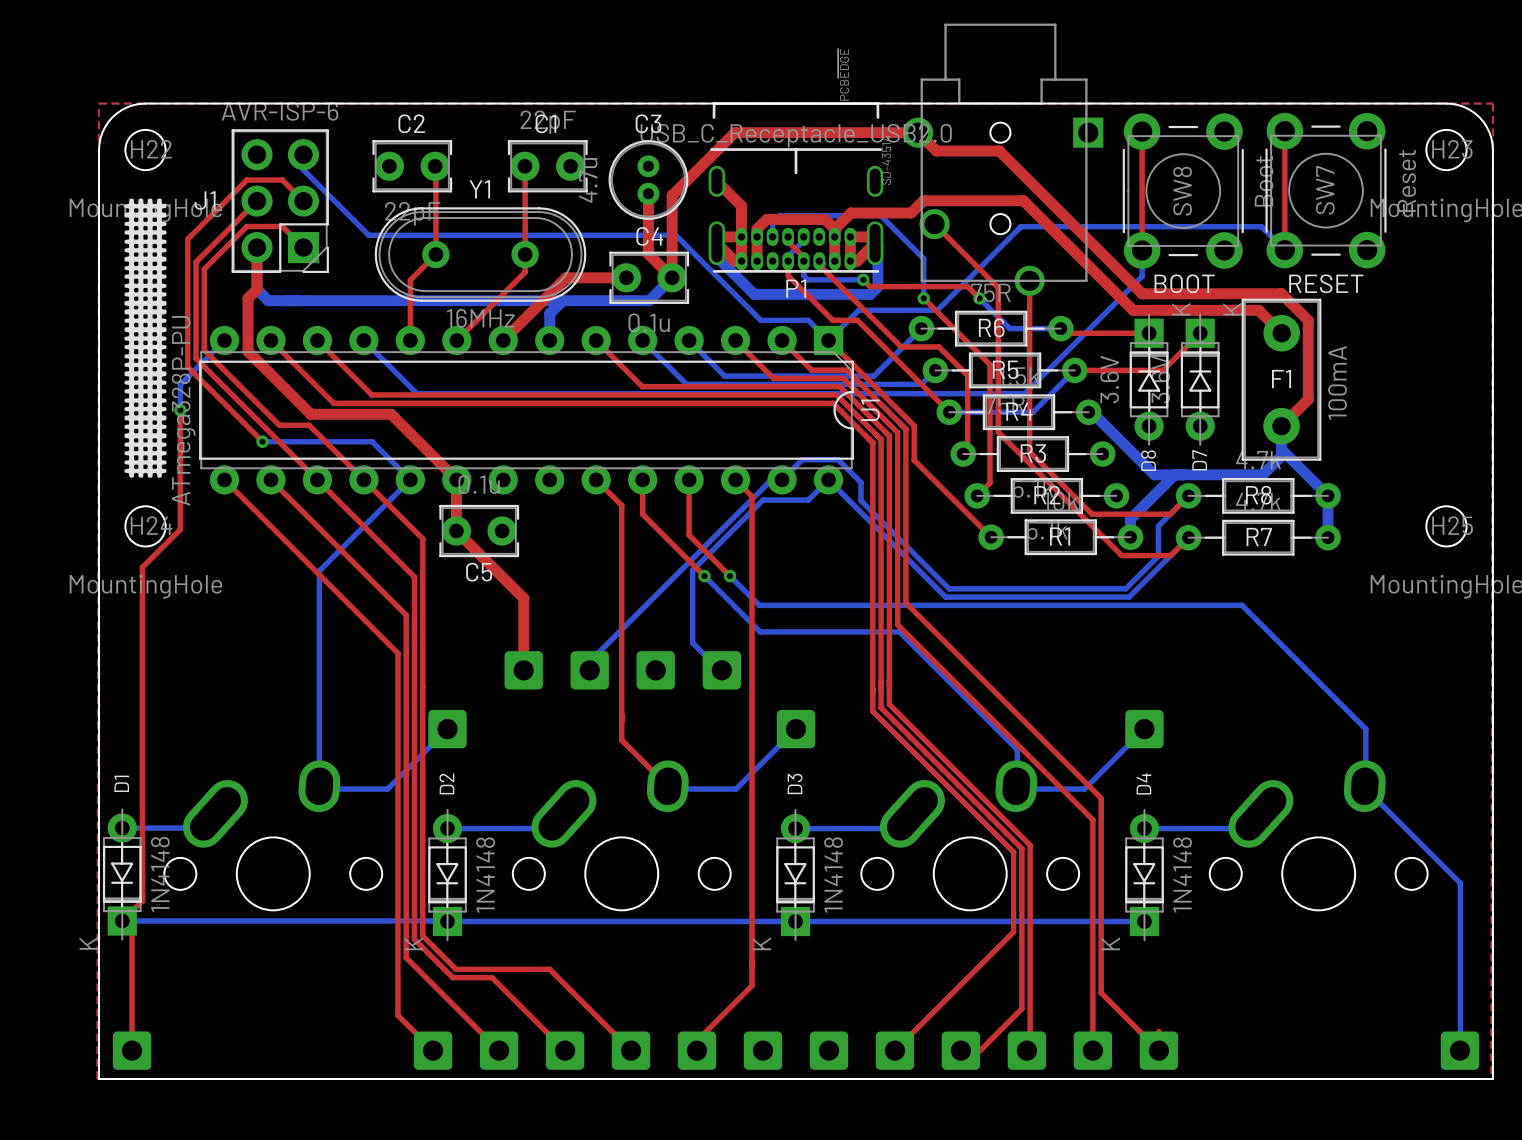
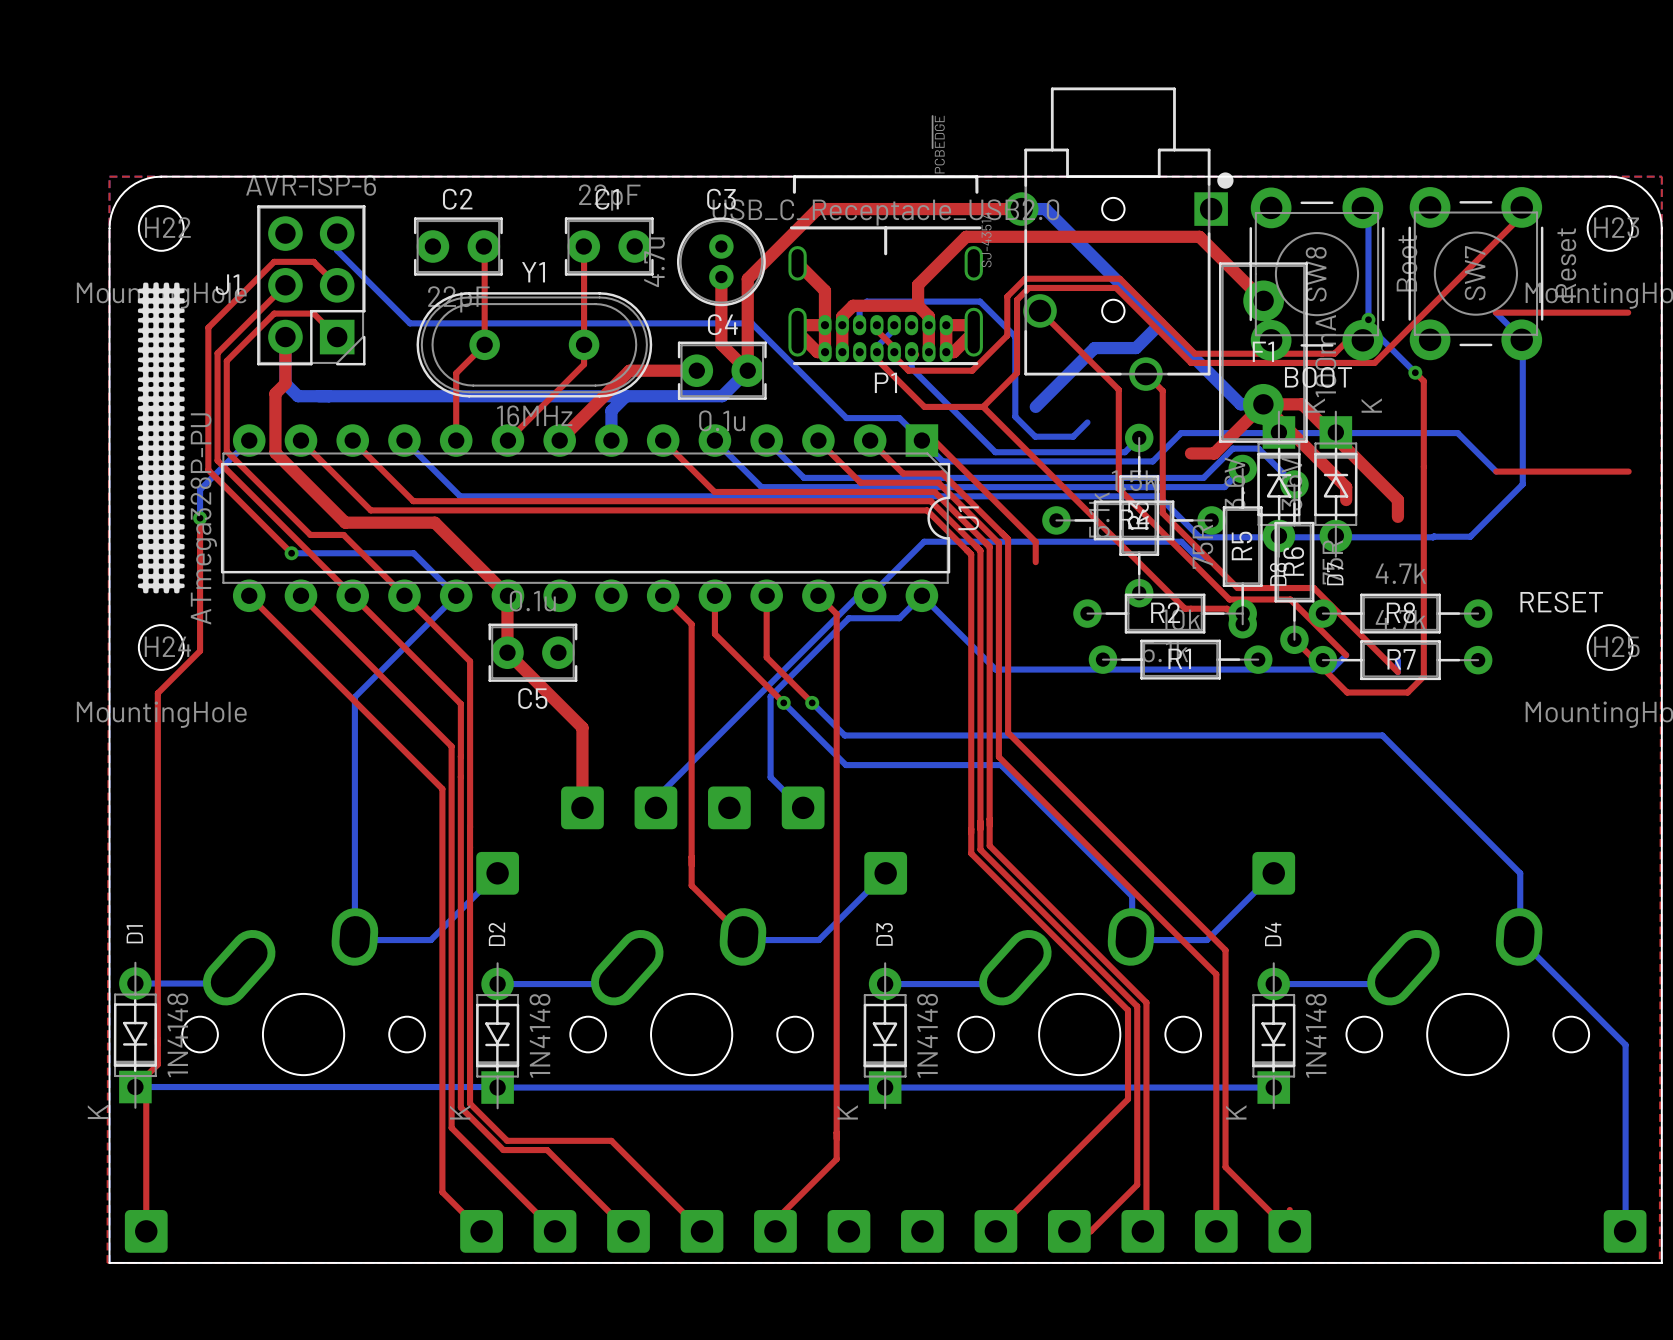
part footprint: [903, 23, 1104, 296] -> [1004, 87, 1234, 391]
top track: (1142, 131) (1142, 250) -> none
top track: (1284, 131) (1284, 250) -> none
top track: (918, 132) (936, 150) (999, 150) (1142, 293) (1281, 293) (1308, 320) (1308, 399) (1281, 426) -> none
bottom track: none -> (1021, 209) (1045, 209) (1240, 404) (1263, 404)
top track: none -> (1525, 211) (1374, 362) (1191, 362) (1116, 287) (1028, 287) (1017, 299) (1017, 373) (983, 406)
bottom track: none -> (1368, 214) (1368, 325) (1415, 372)
top track: none -> (1263, 300) (1199, 236) (966, 236) (918, 284) (918, 305)
top track: none -> (1495, 312) (1628, 312)
bottom track: none -> (1495, 312) (1522, 339) (1522, 484) (1470, 536) (1433, 536)
top track: (834, 229) (851, 212) (911, 212) (923, 200) (1023, 200) (1133, 310) (1258, 310) (1281, 333) -> none
top track: none -> (1368, 319) (1334, 353) (1194, 353) (1119, 278) (1025, 278) (1007, 296) (1007, 335) (972, 370) (908, 370) (894, 356)
via: none -> (1368, 319)
bottom track: none -> (1160, 323) (1135, 348) (1094, 348) (1035, 406)
bottom track: (716, 243) (716, 256) (754, 294) (870, 294) (877, 286) (877, 246) (875, 243) -> none
bottom track: (912, 247) (923, 258) (923, 298) -> (1015, 336) (1015, 416) (1035, 436) (1073, 436) (1087, 422)
bottom track: (1142, 250) (1142, 276) (1024, 393) (417, 393) (413, 390) -> (1434, 536) (1199, 537) (1158, 496) (460, 496)
bottom track: (1284, 250) (1261, 226) (1021, 226) (937, 310) (858, 310) (828, 340) -> none
bottom track: (803, 261) (803, 275) (807, 279) (863, 279) -> none
top track: (819, 261) (819, 265) (901, 346) (939, 346) (967, 375) (967, 449) (963, 454) -> none
bottom track: none -> (911, 357) (911, 368) (995, 452) (1124, 452) (1139, 437)
top track: (788, 267) (788, 275) (832, 320) (857, 320) (949, 412) -> (877, 359) (924, 406) (983, 406)
top track: (863, 279) (870, 286) (967, 286) (979, 298) -> none
via: (863, 279) -> none
top track: none -> (1415, 372) (1423, 381) (1423, 676) (1407, 692) (1347, 692) (1294, 639)
via: none -> (1415, 372)
top track: (1029, 280) (1029, 451) (1092, 514) (1170, 514) (1188, 495) -> (1145, 374) (1162, 390) (1162, 513) (1237, 588) (1313, 588) (1397, 672)
text position: RESET (1326, 283) -> RESET (1561, 602)
top track: (998, 287) (998, 432) (1121, 555) (1170, 555) (1188, 537) -> (1110, 381) (1118, 389) (1118, 488) (1229, 599) (1290, 599) (1346, 655)
top track: (923, 298) (989, 364) (989, 483) (977, 495) -> none
via: (923, 298) -> none
bottom track: (979, 298) (1009, 328) (1060, 328) -> none
via: (979, 298) -> none
top track: none -> (1263, 404) (1346, 487) (1346, 500)
top track: none -> (1263, 404) (1214, 453) (1190, 453)
top track: none -> (1263, 404) (1302, 404) (1397, 500) (1397, 516)
top track: none -> (983, 406) (1184, 608) (1227, 608) (1242, 624)
bottom track: (921, 328) (873, 376) (724, 376) (722, 374) -> (1294, 484) (1258, 448) (1232, 448) (1203, 477) (804, 477)
R6 rotation: 0° (991, 328) -> 90° clockwise (1294, 562)
R6 position: (991, 328) -> (1294, 562)
top track: (1060, 328) (1065, 333) (1149, 333) -> none
top track: (1200, 333) (1163, 370) (1074, 370) -> none
top track: (828, 340) (914, 425) (914, 460) (991, 537) -> none
top track: none -> (934, 440) (1035, 541) (1035, 562)
bottom track: none -> (935, 453) (942, 461) (1152, 461) (1181, 433) (1457, 433) (1496, 471)
top track: none -> (1496, 471) (1628, 471)
bottom track: (935, 370) (921, 384) (686, 384) (684, 382) -> (1242, 469) (1224, 487) (761, 487)
R5 rotation: 0° (1005, 370) -> 90° clockwise (1242, 546)
R5 position: (1005, 370) -> (1242, 546)
bottom track: (1074, 370) (1032, 412) (949, 412) -> none
F1 position: (1281, 379) -> (1263, 352)
bottom track: (1088, 412) (1092, 412) (1154, 474) (1262, 474) (1281, 456) (1281, 426) -> none
bottom track: (1281, 449) (1327, 495) (1327, 537) -> none
R3 rotation: 0° (1032, 454) -> 90° clockwise (1139, 515)
bottom track: (802, 459) (838, 459) (861, 482) (861, 500) (949, 588) (1125, 588) (1158, 556) (1158, 526) (1188, 495) -> (892, 573) (924, 541) (1181, 541) (1196, 556) (1206, 556)
bottom track: (1174, 474) (1130, 519) (1130, 537) -> none
bottom track: (1188, 537) (1129, 597) (945, 597) (894, 546) -> (1346, 655) (1331, 669) (995, 669)
bottom track: none -> (1397, 660) (1397, 672)

